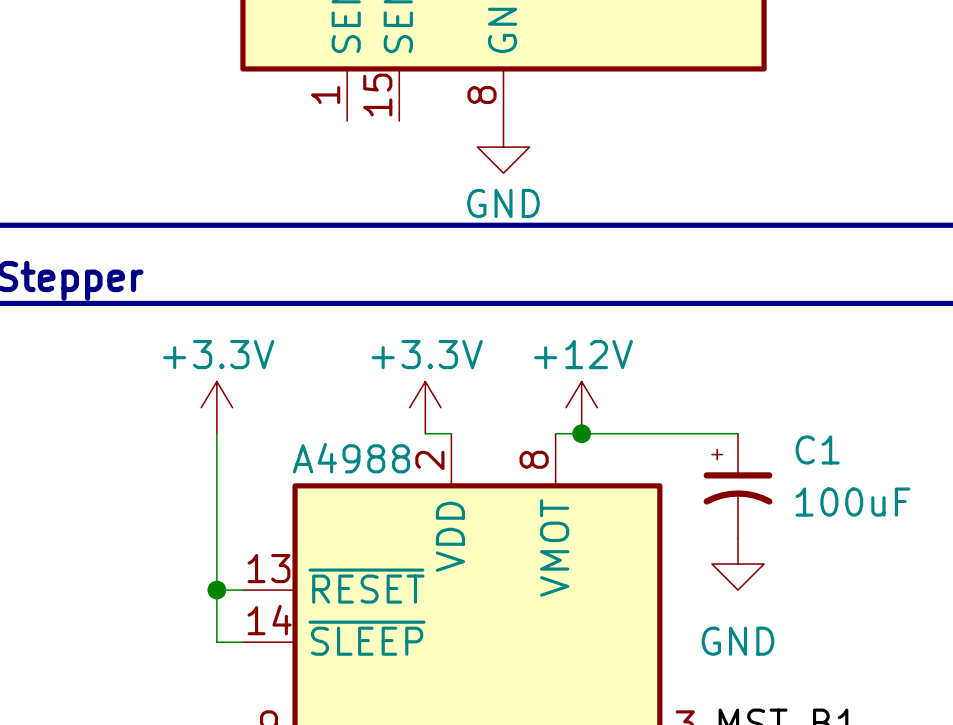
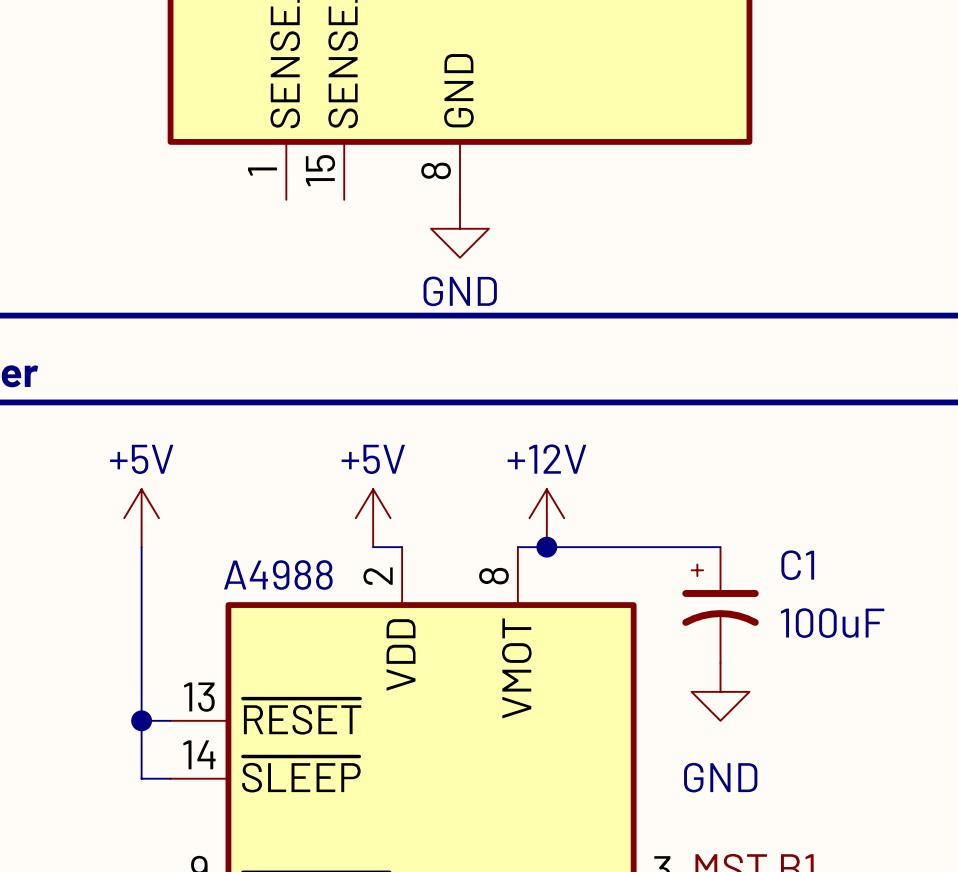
power symbol: +3.3V (216, 407) -> +5V (141, 518)
power symbol: +3.3V (425, 407) -> +5V (373, 518)

